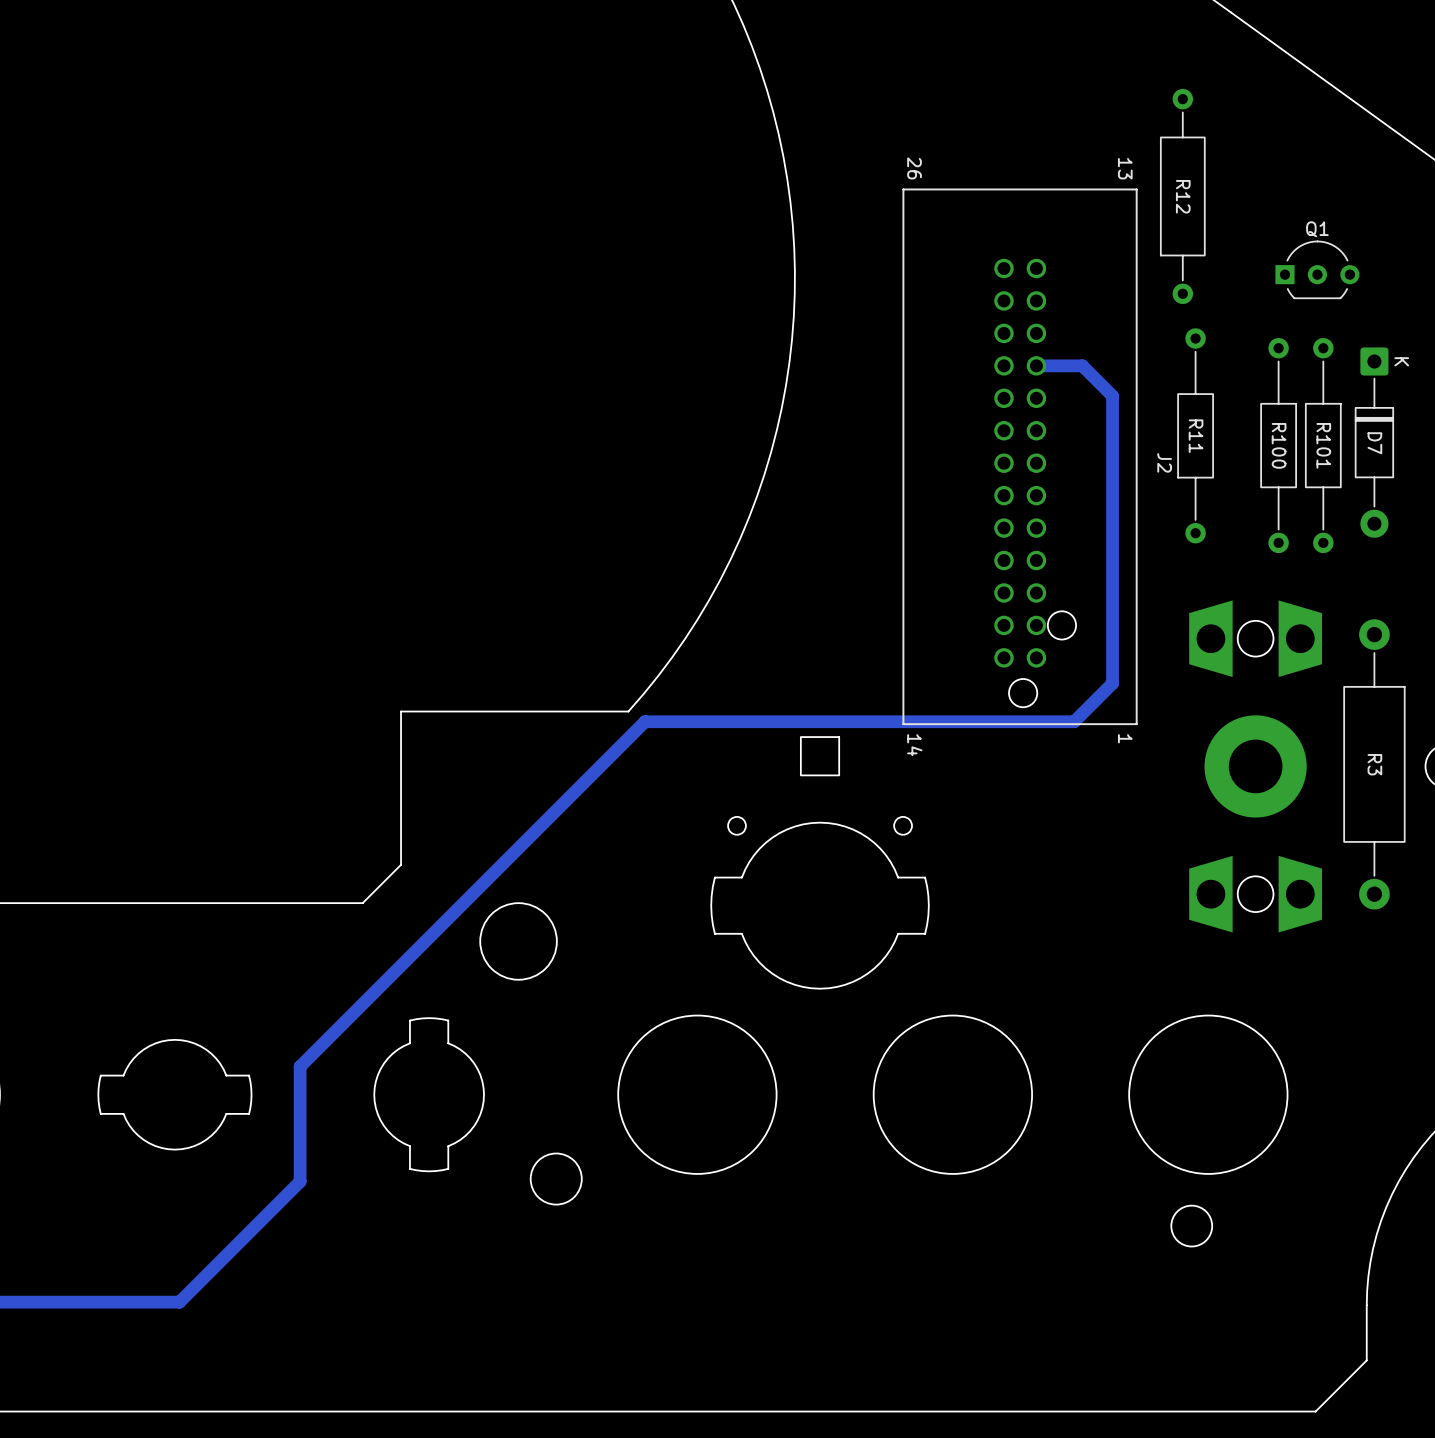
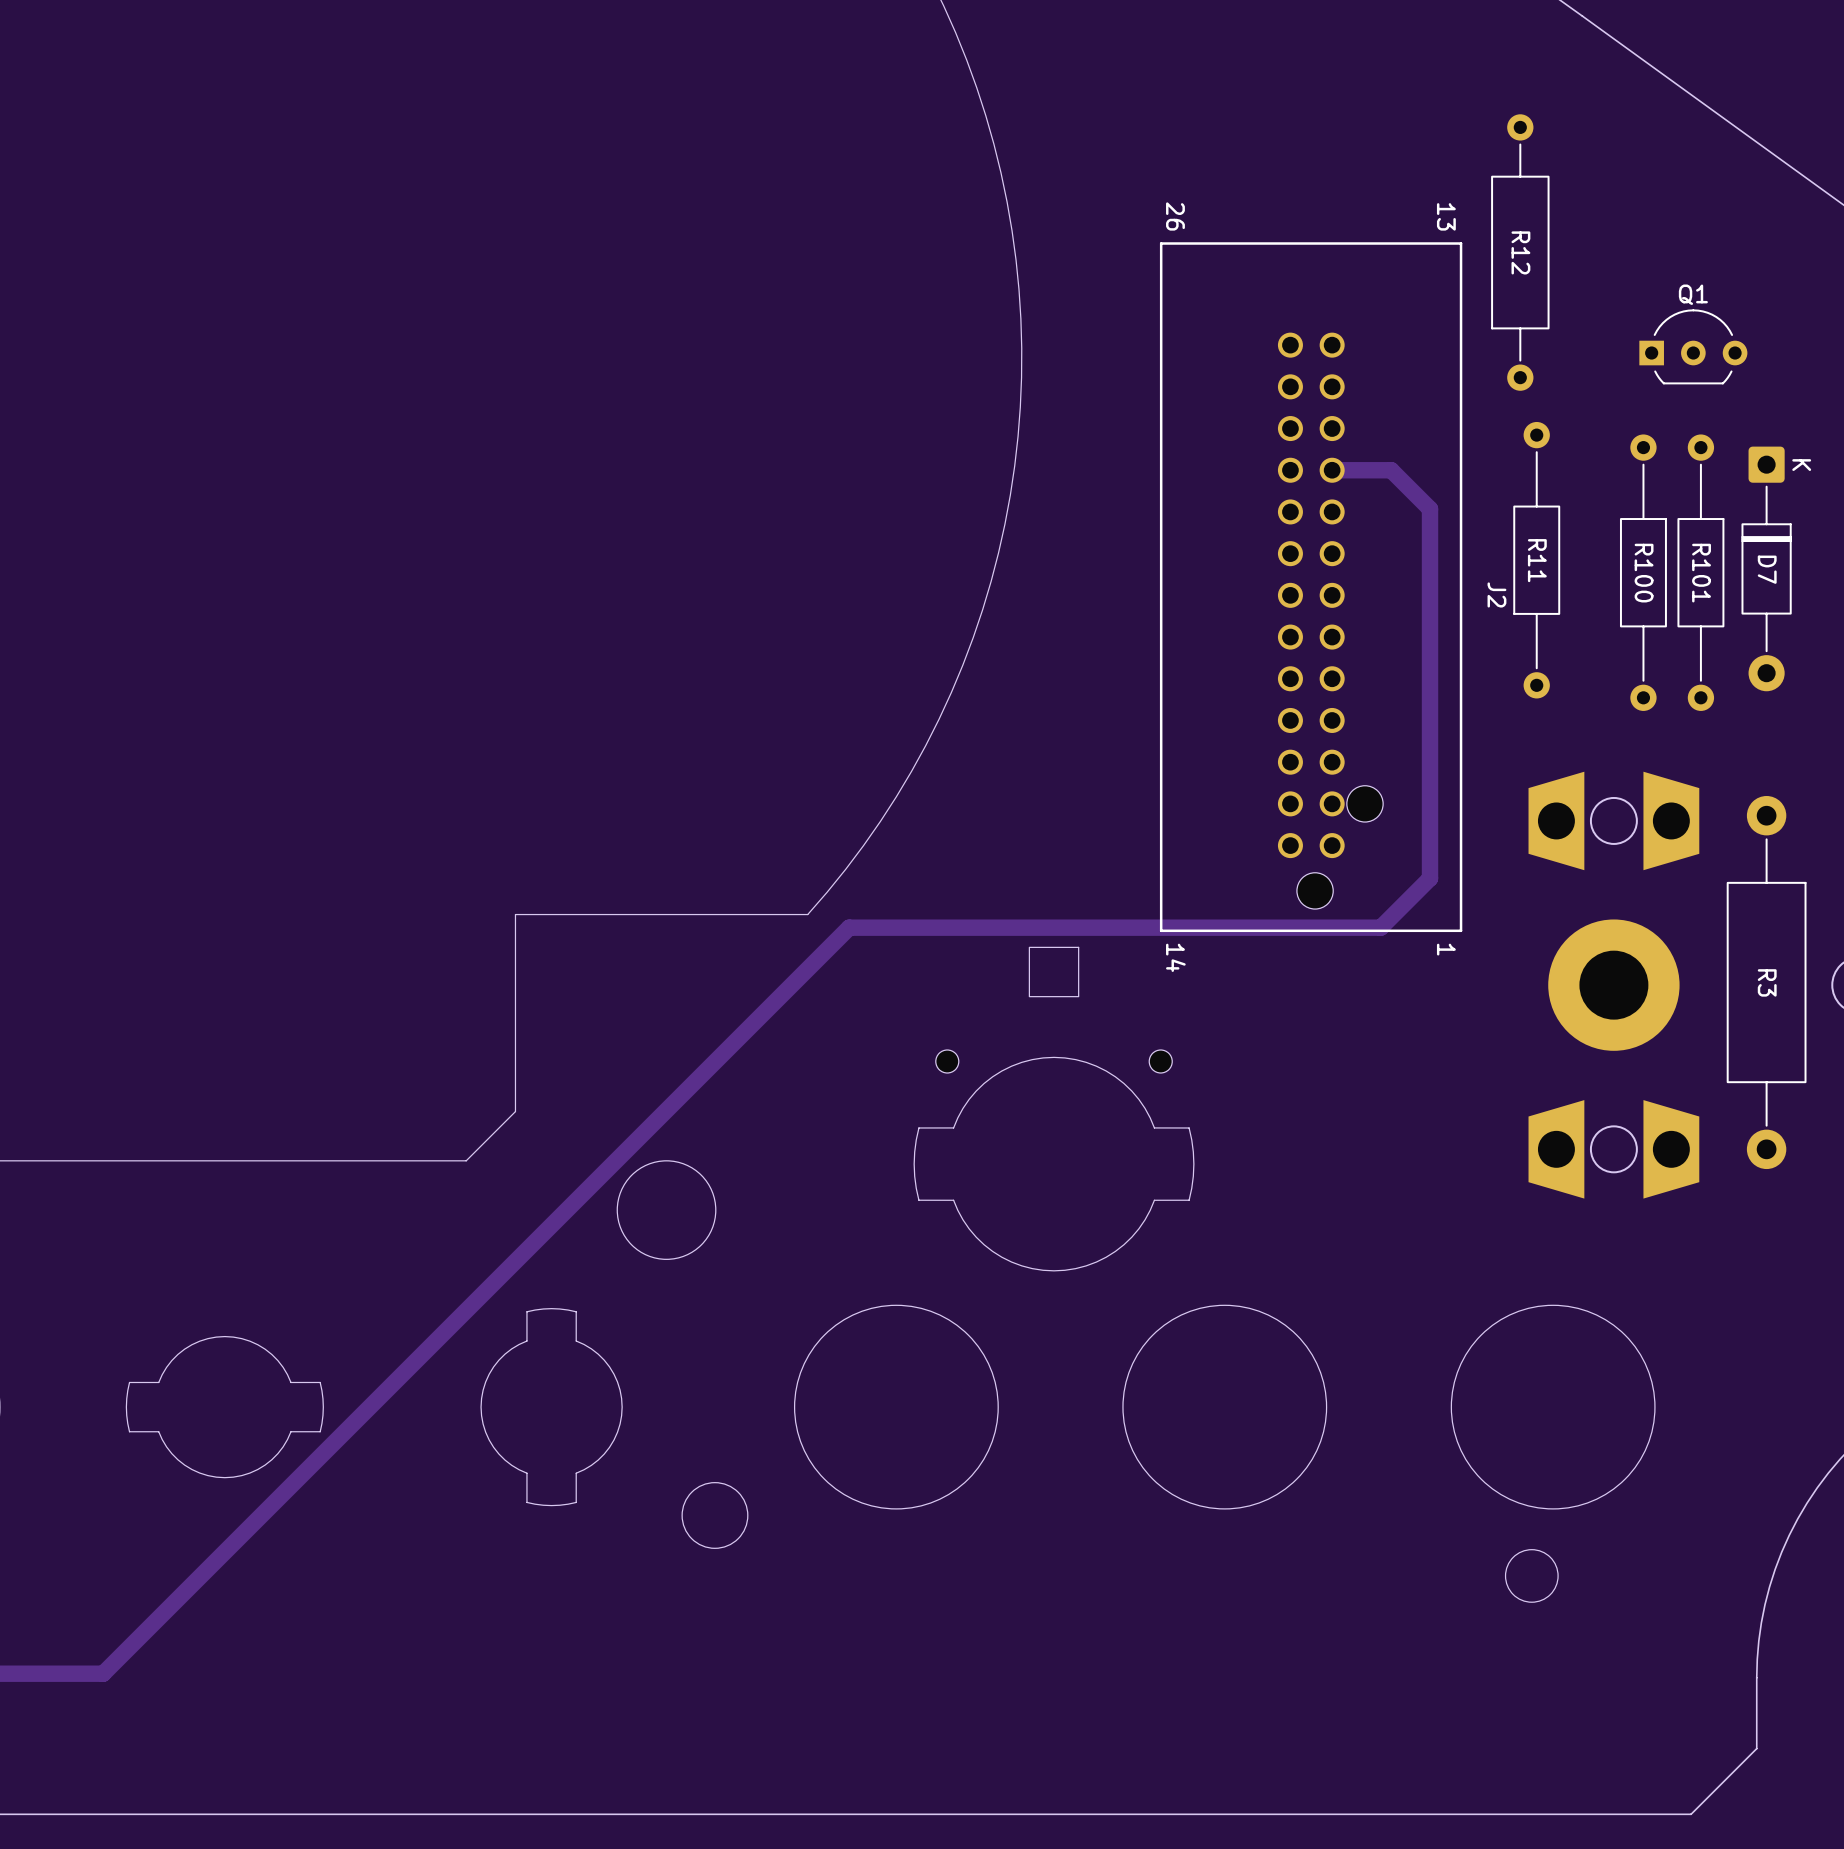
track: (660, 721) (645, 721) (300, 1066) (300, 1181) (179, 1302) (80, 1302) -> (849, 927) (103, 1673)

